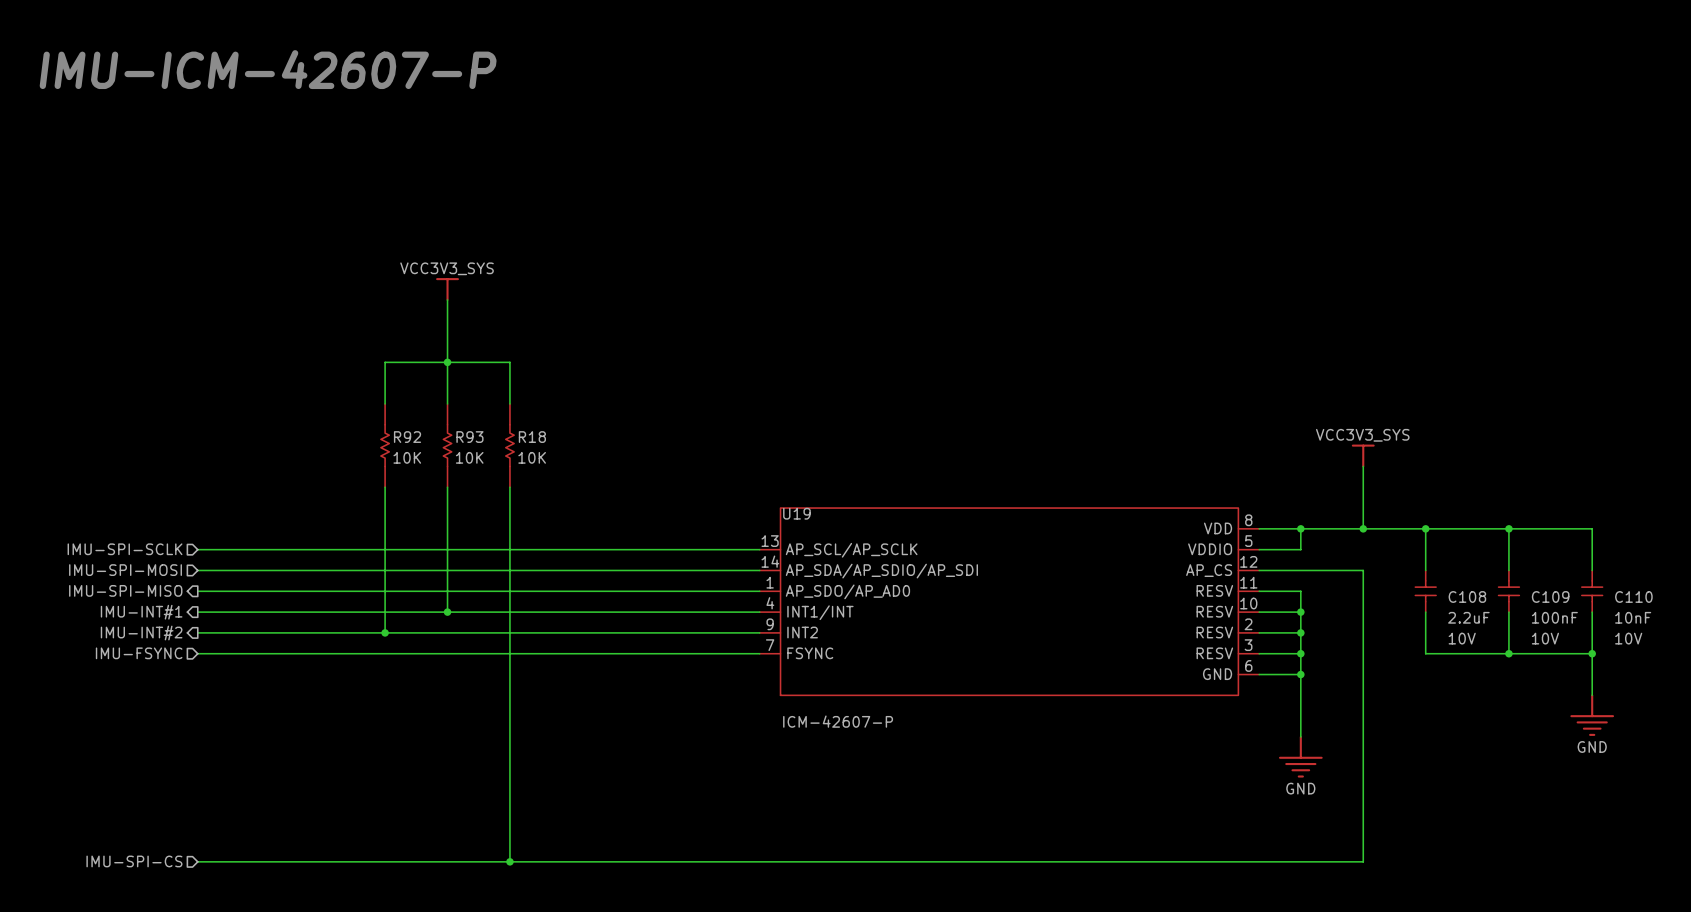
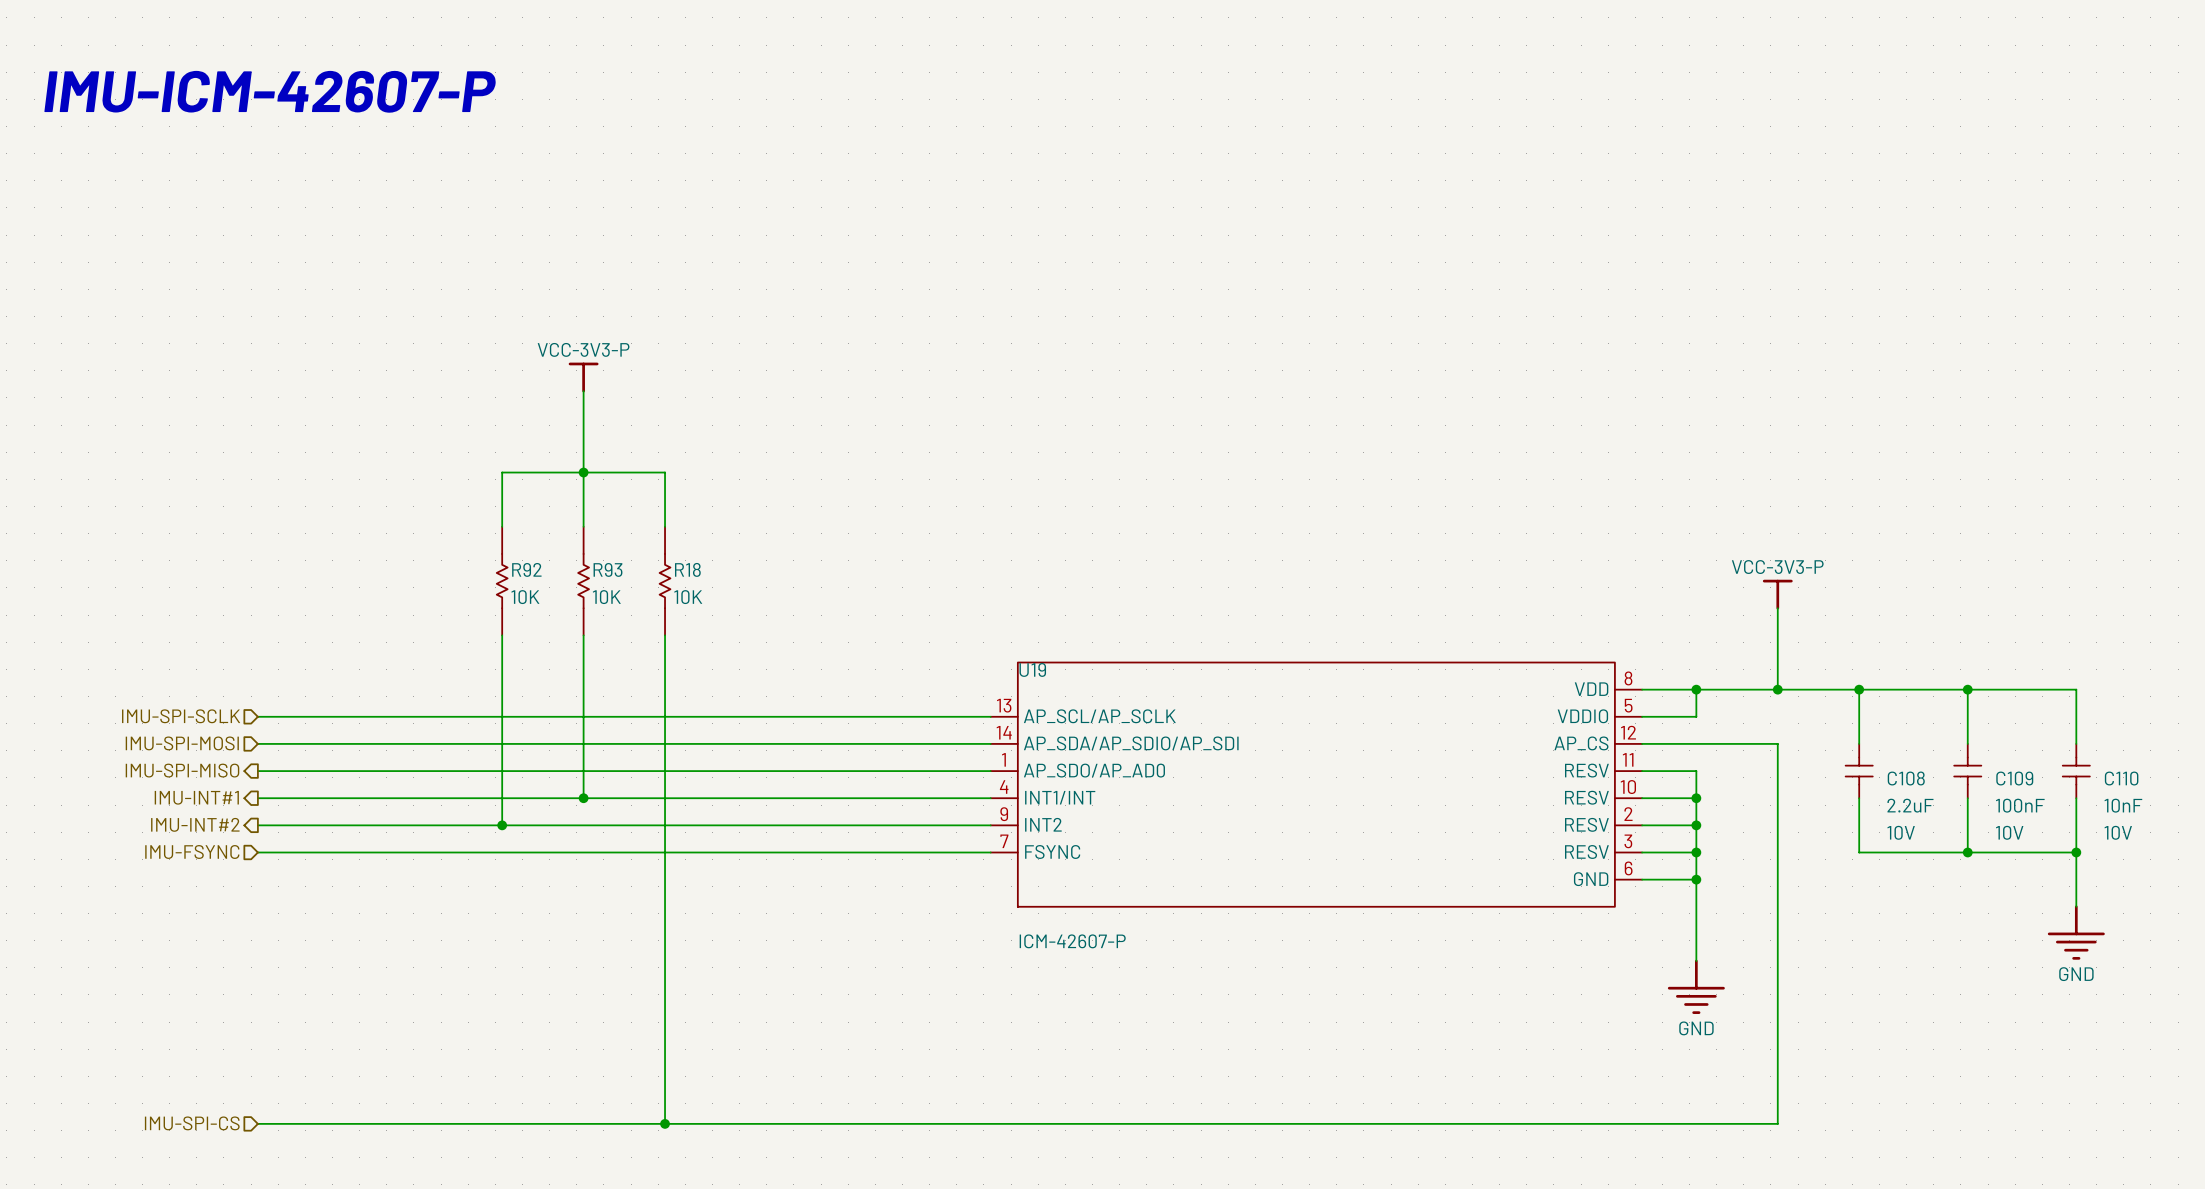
power symbol: VCC3V3_SYS (447, 289) -> VCC-3V3-P (583, 377)
power symbol: VCC3V3_SYS (1363, 456) -> VCC-3V3-P (1777, 594)

